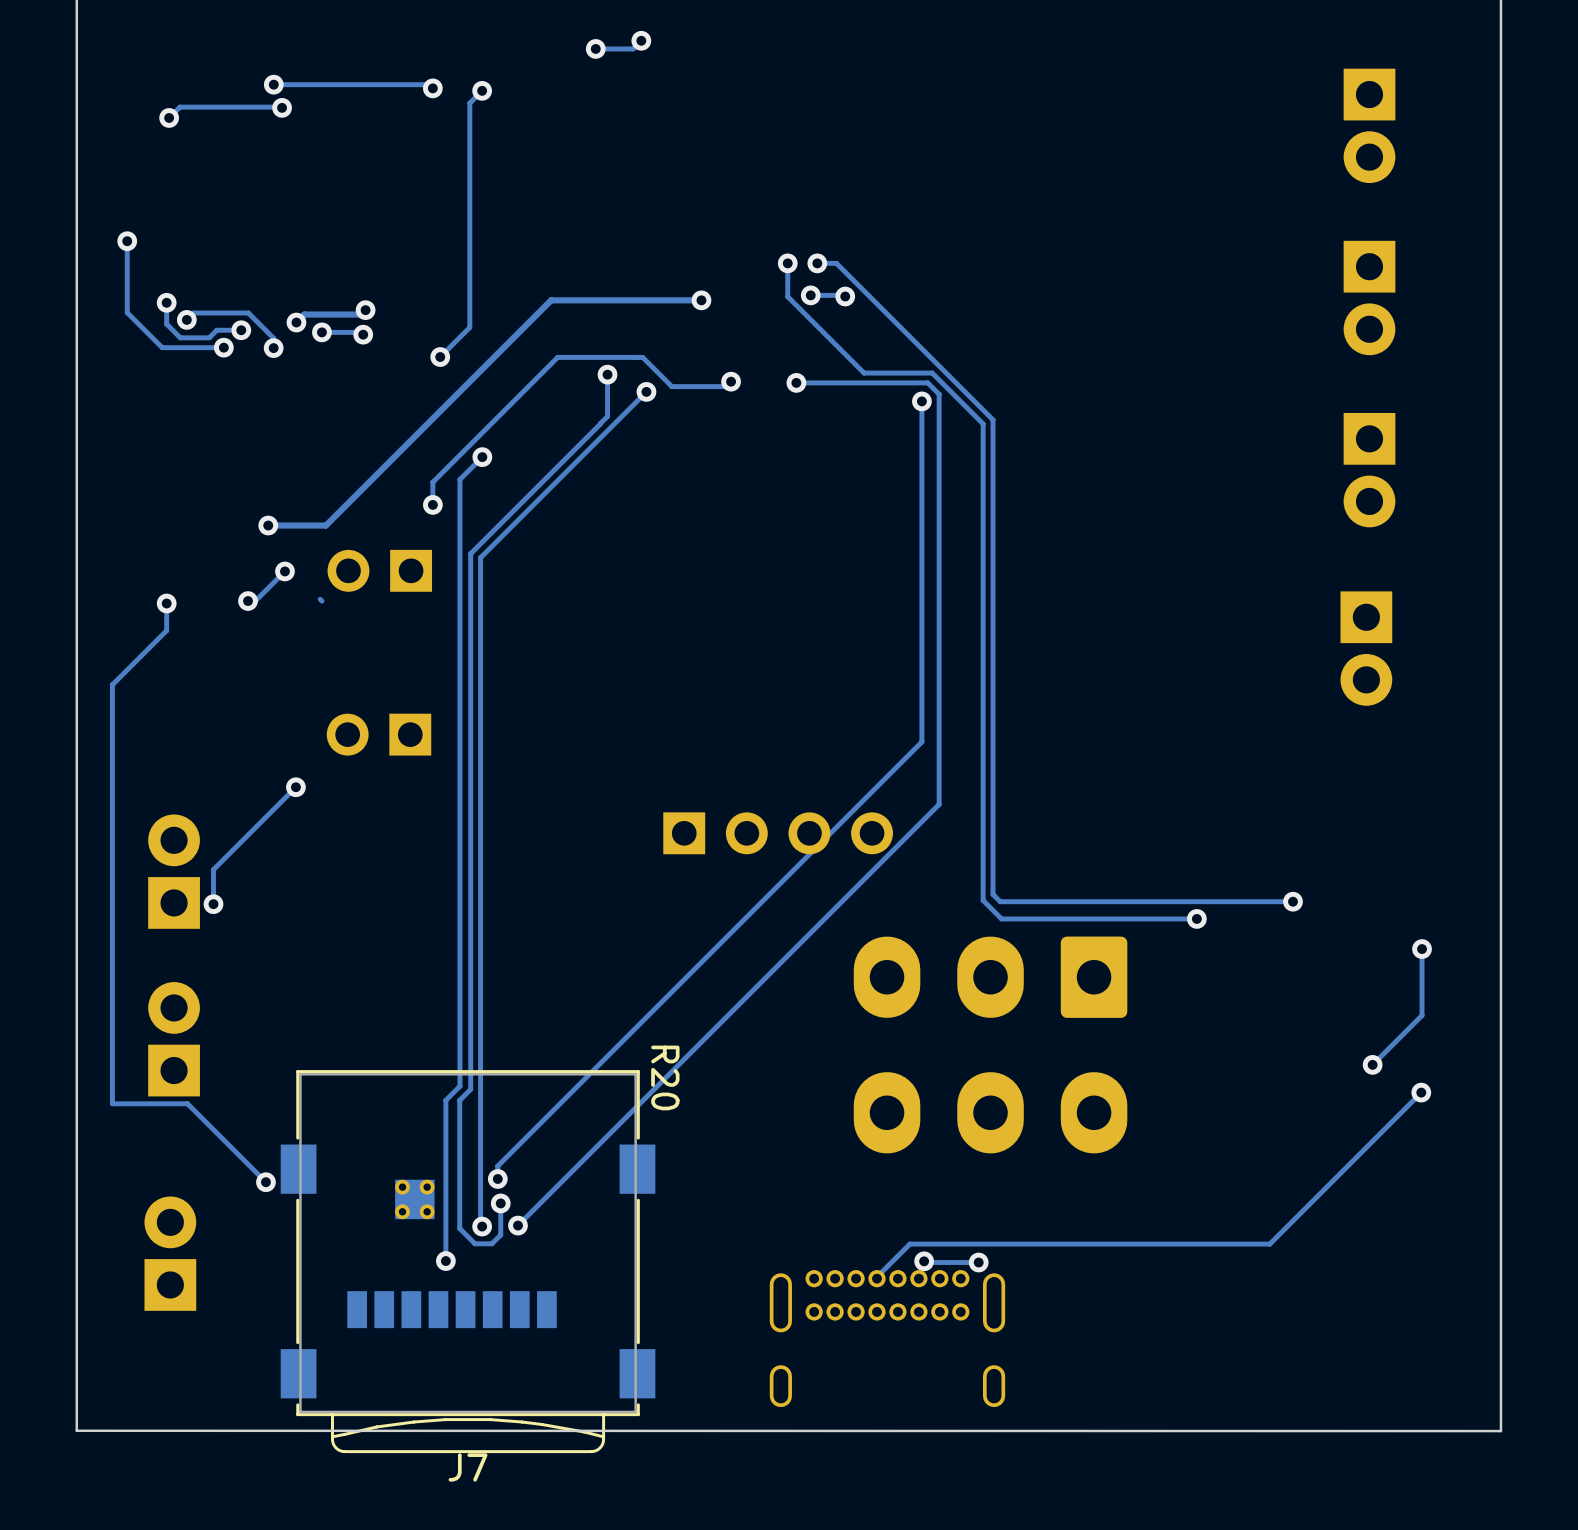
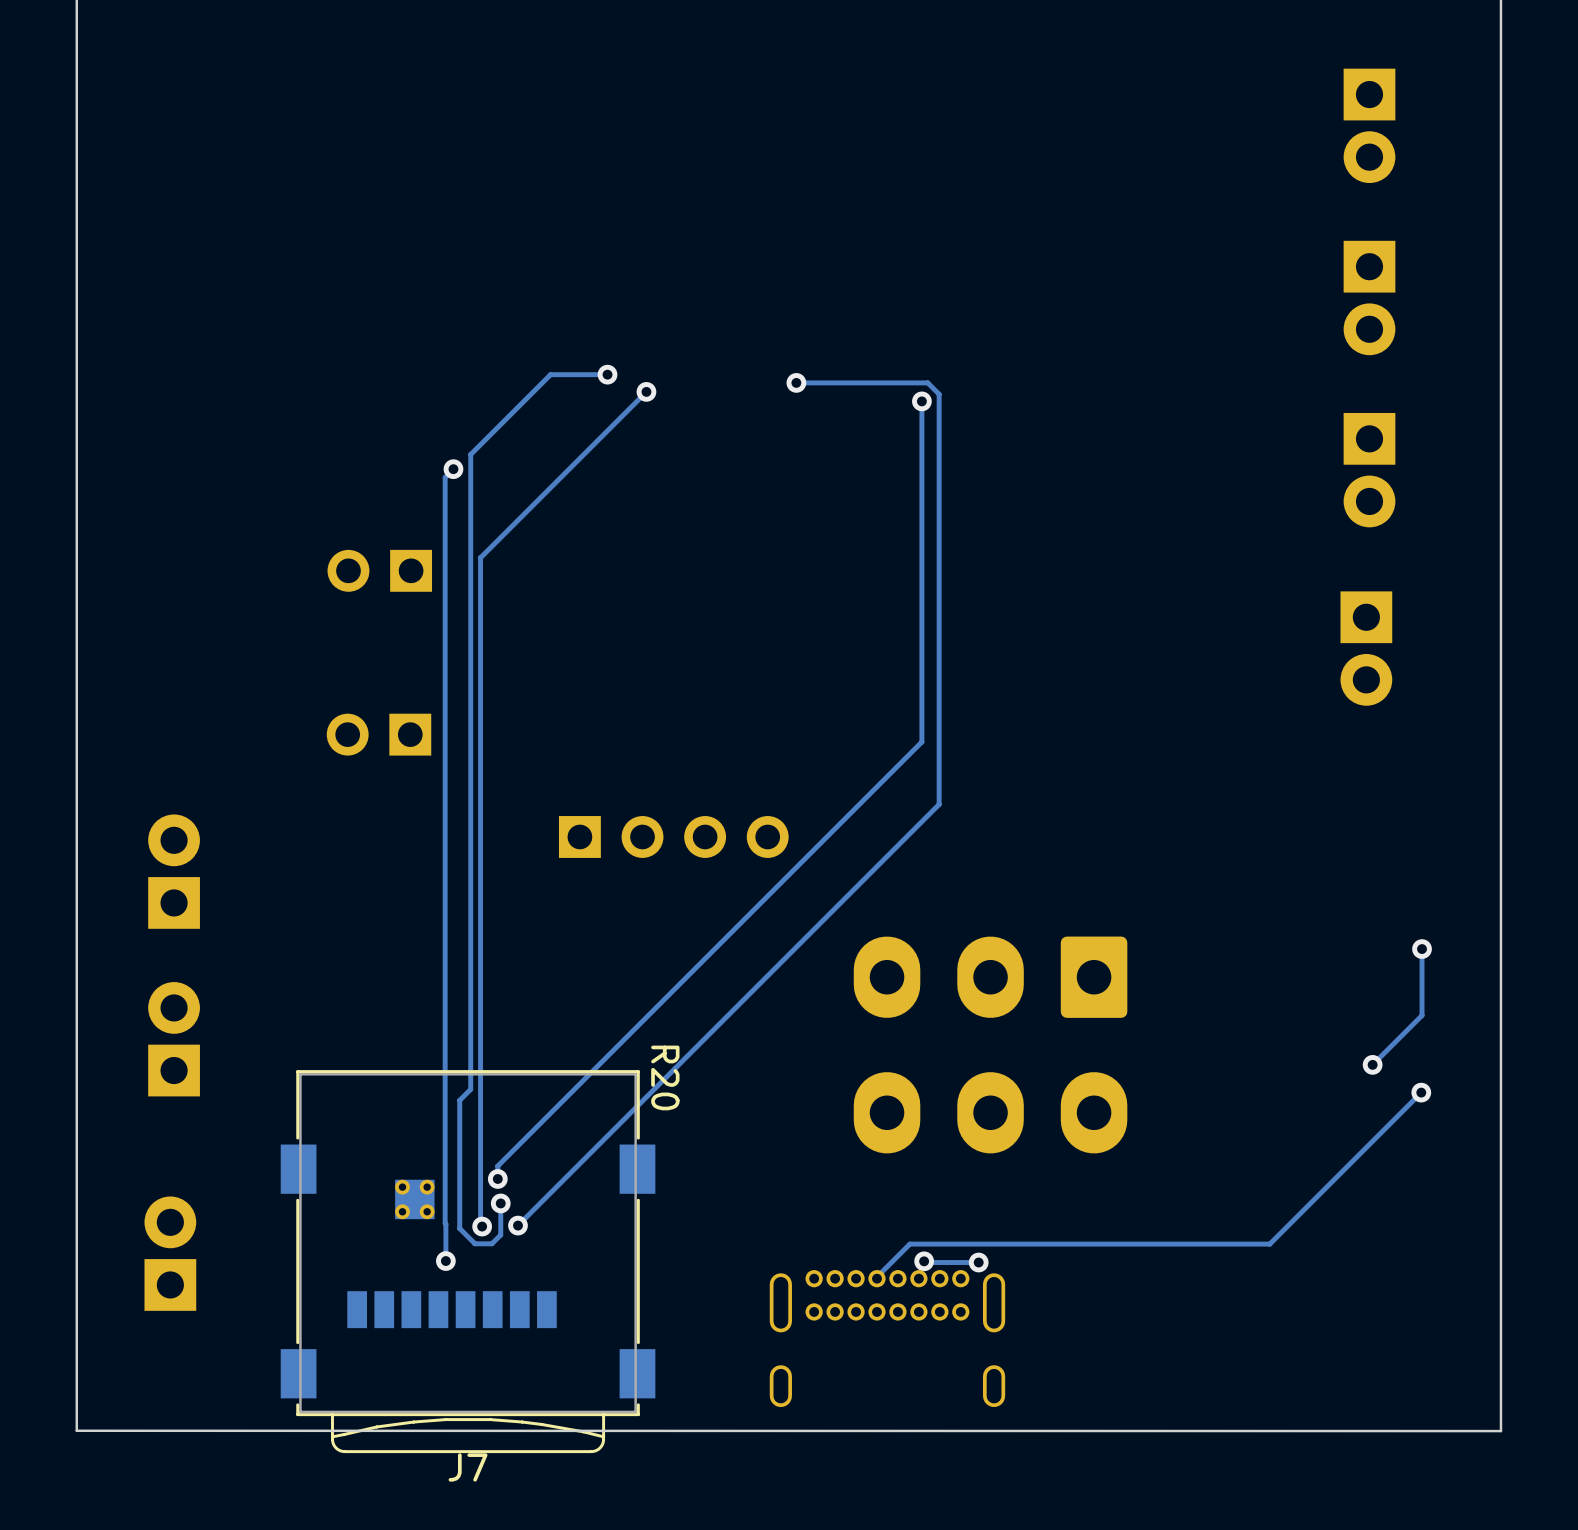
track: (641, 40) (633, 48) (595, 48) -> none
via: (641, 40) -> none
via: (595, 48) -> none
track: (273, 84) (429, 84) (432, 88) -> none
via: (273, 84) -> none
via: (432, 88) -> none
track: (482, 90) (469, 103) (469, 327) (440, 357) -> none
via: (482, 90) -> none
track: (282, 107) (179, 107) (169, 117) -> none
via: (282, 107) -> none
via: (169, 117) -> none
track: (127, 241) (127, 312) (162, 347) (223, 347) -> none
via: (127, 241) -> none
track: (787, 263) (787, 296) (864, 373) (932, 373) (983, 423) (983, 900) (1001, 918) (1196, 918) -> none
via: (787, 263) -> none
track: (817, 263) (836, 263) (993, 419) (993, 894) (1000, 901) (1293, 901) -> none
via: (817, 263) -> none
track: (810, 295) (845, 296) -> none
via: (810, 295) -> none
via: (845, 296) -> none
track: (701, 300) (551, 300) (325, 525) (268, 525) -> none
via: (701, 300) -> none
track: (166, 302) (166, 324) (180, 337) (209, 337) (216, 330) (241, 330) -> none
via: (166, 302) -> none
track: (365, 310) (361, 314) (304, 314) (296, 322) -> none
via: (365, 310) -> none
track: (186, 319) (193, 313) (248, 313) (273, 338) (273, 348) -> none
via: (186, 319) -> none
via: (296, 322) -> none
via: (241, 330) -> none
track: (321, 332) (360, 332) (363, 334) -> none
via: (321, 332) -> none
via: (363, 334) -> none
via: (223, 347) -> none
via: (273, 348) -> none
via: (440, 357) -> none
track: (607, 374) (607, 416) (600, 423) -> none
track: (731, 381) (726, 386) (671, 386) (642, 357) (557, 357) (432, 482) (432, 504) -> none
via: (731, 381) -> none
track: (600, 423) (470, 553) -> (607, 374) (550, 374) (470, 454) (470, 553)
track: (482, 457) (459, 479) (459, 1086) (445, 1100) (445, 1224) -> (453, 469) (445, 477) (445, 1224)
via: (482, 457) -> none
via: none -> (453, 469)
via: (432, 504) -> none
via: (268, 525) -> none
track: (284, 571) (255, 601) (248, 601) -> none
via: (284, 571) -> none
track: (320, 599) (321, 601) -> none
via: (248, 601) -> none
track: (166, 603) (166, 630) (112, 684) (112, 1103) (187, 1103) (265, 1182) -> none
via: (166, 603) -> none
track: (295, 787) (213, 869) (213, 904) -> none
via: (295, 787) -> none
part position: (778, 833) -> (673, 836)
via: (1293, 901) -> none
via: (213, 904) -> none
via: (1196, 918) -> none
via: (265, 1182) -> none

